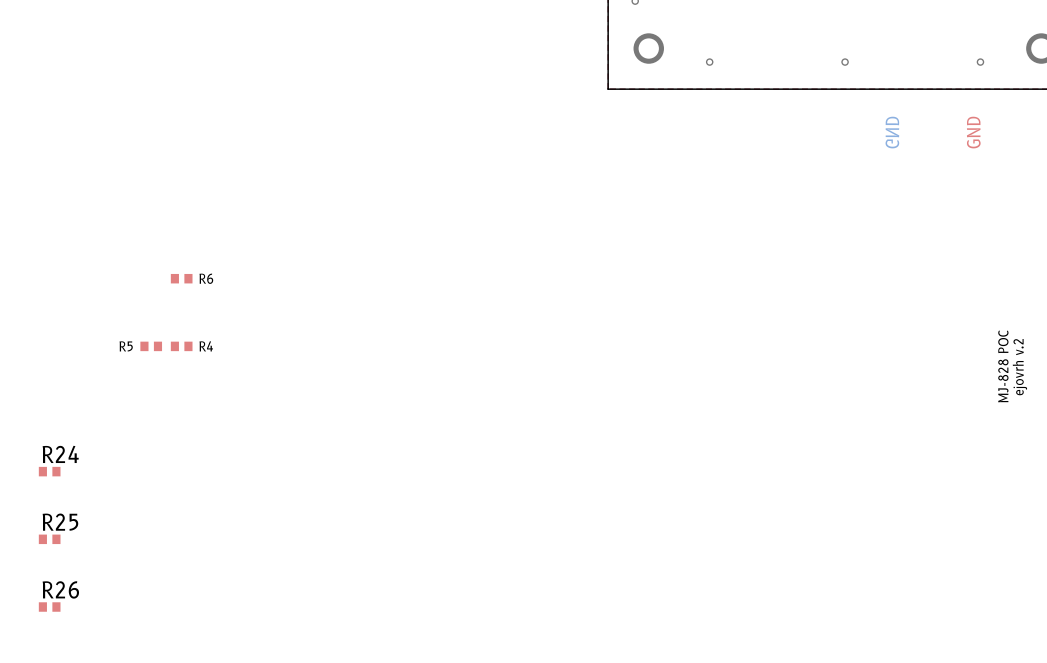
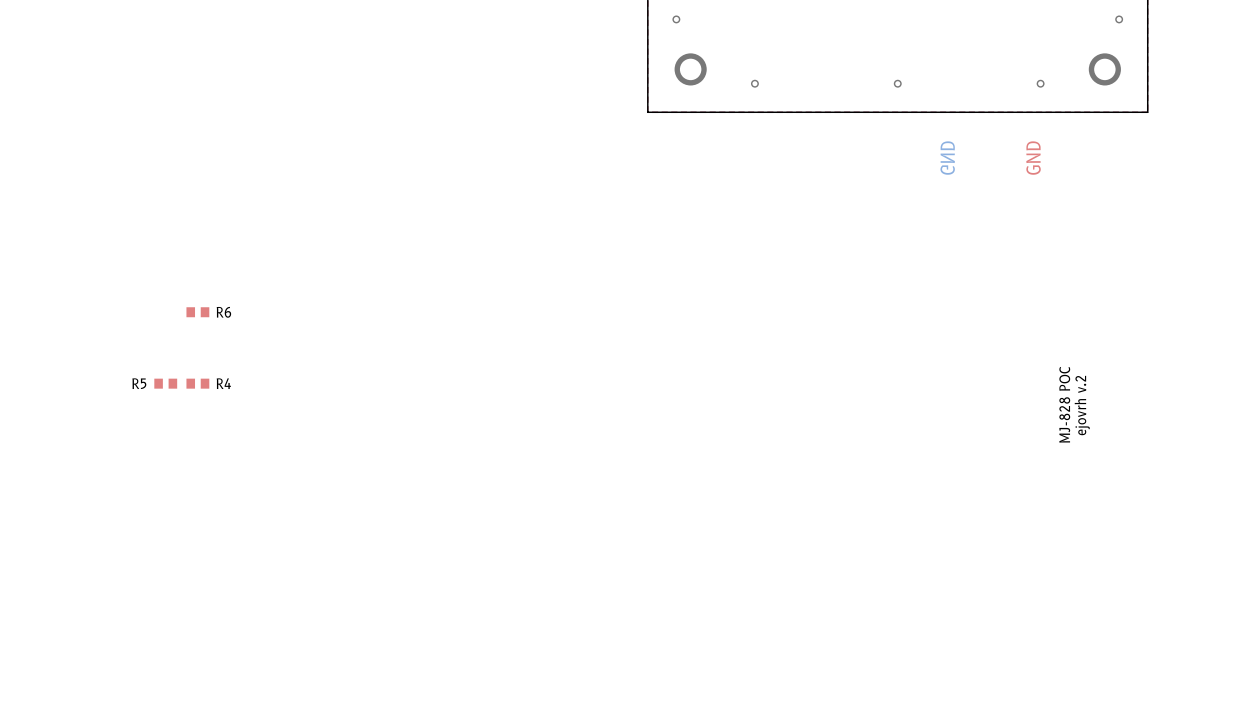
R24: (49, 471) -> none
R25: (49, 539) -> none
R26: (49, 607) -> none

